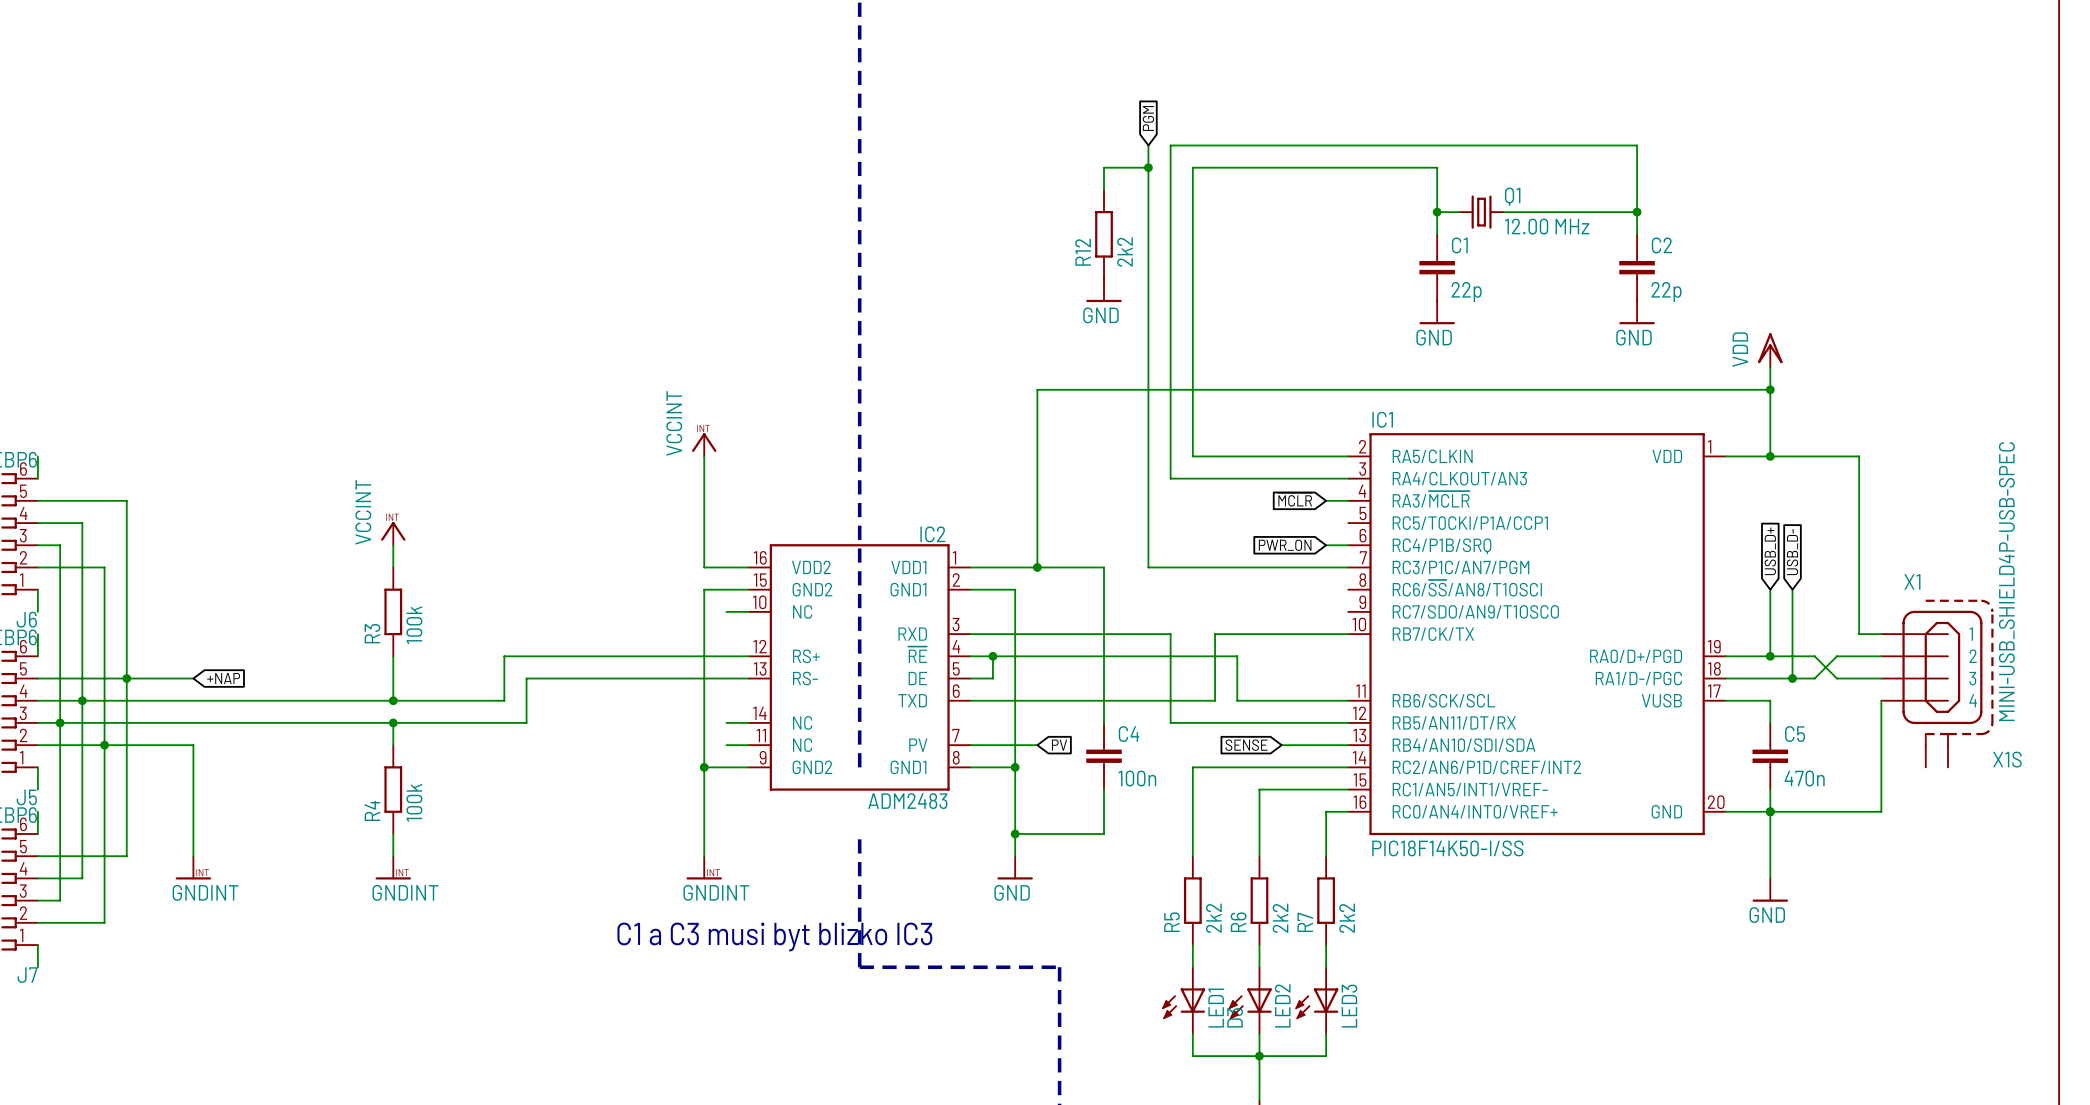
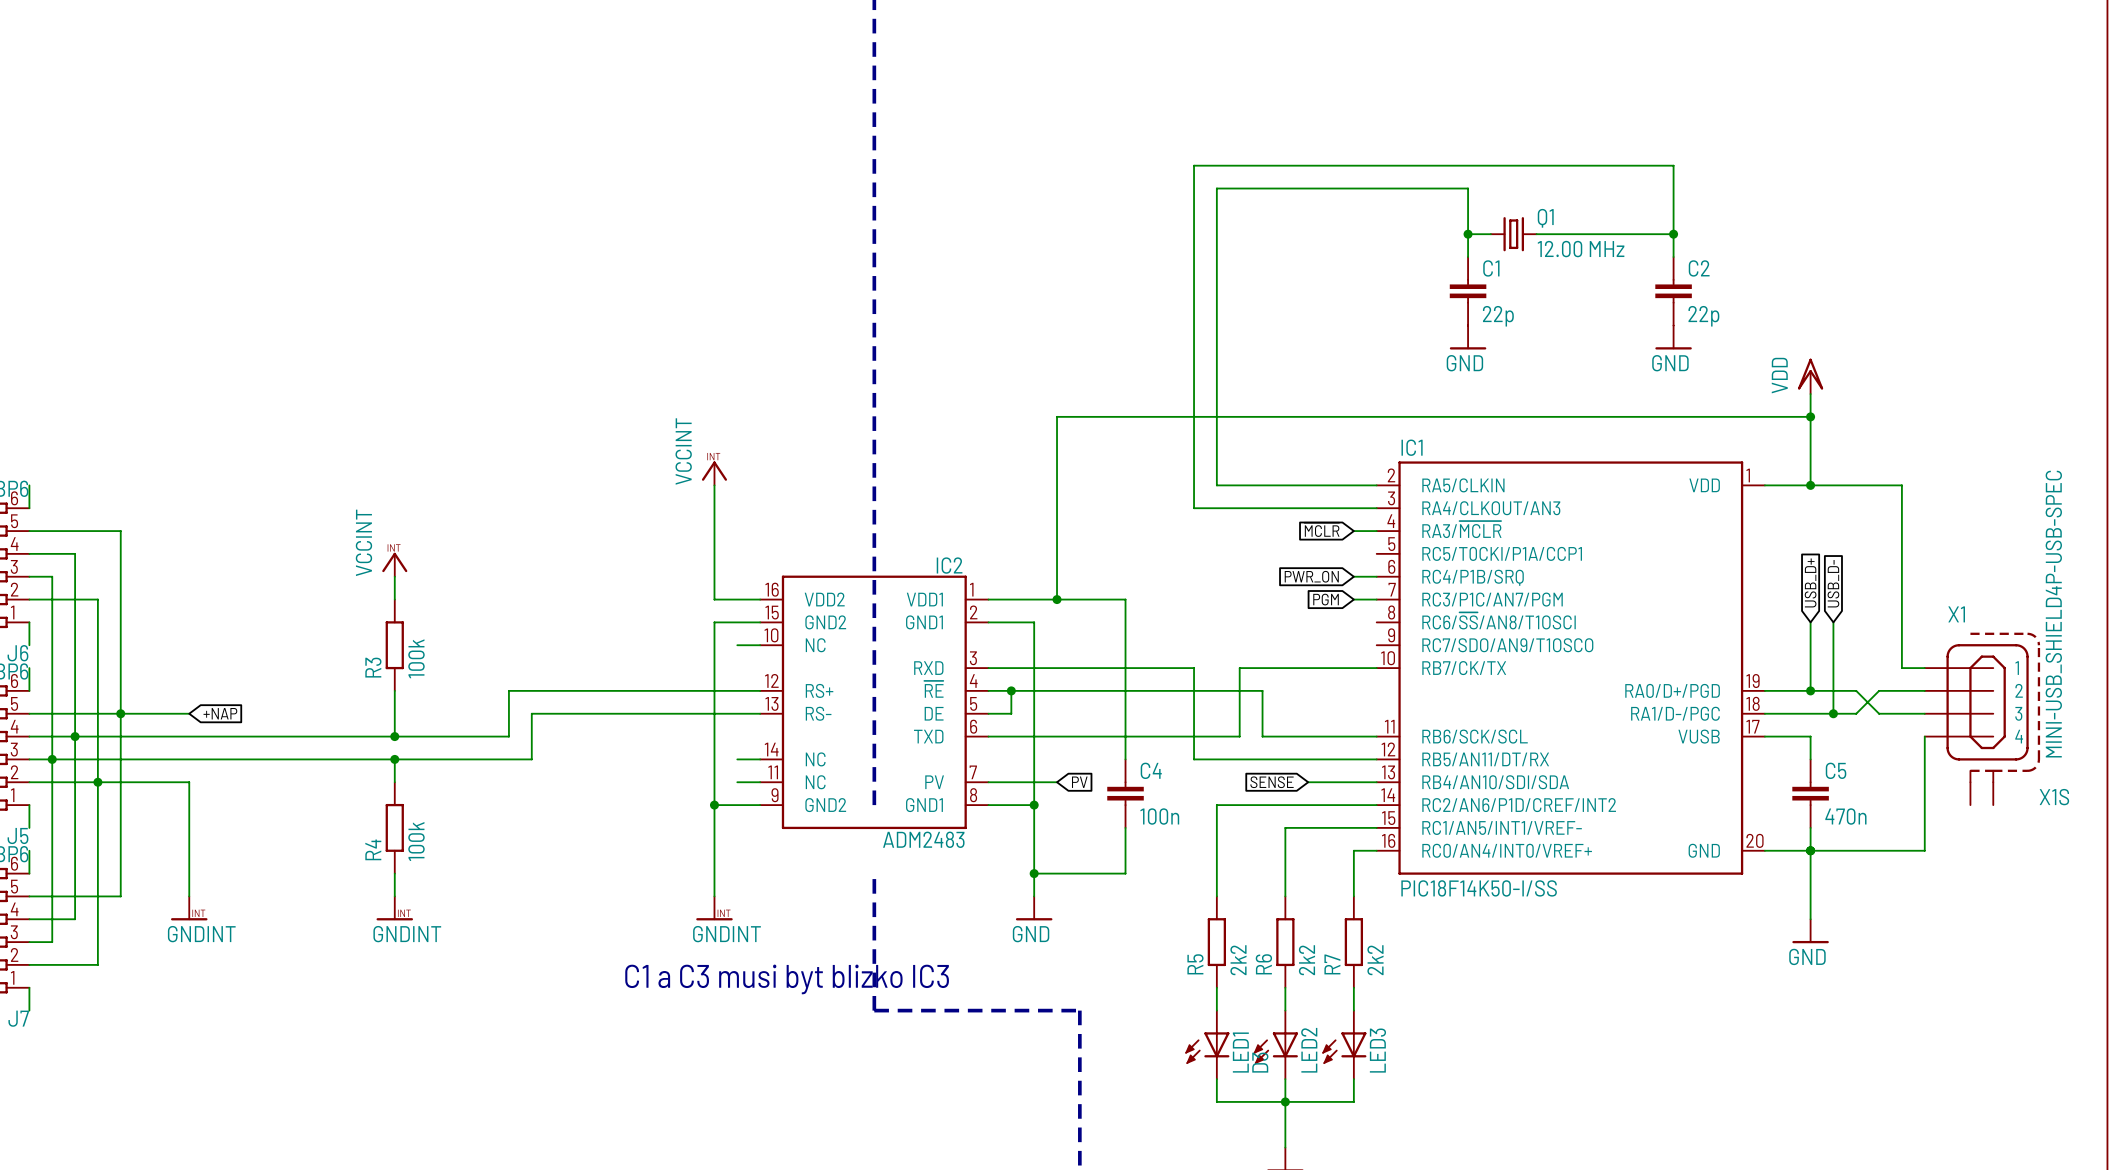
global label: PGM (1148, 118) -> none
wire: (1148, 145) (1148, 567) (1326, 567) -> none
wire: (1148, 167) (1104, 167) (1104, 189) -> none
junction: (1148, 167) -> none
R12: 2k2 (1104, 234) -> none
power symbol: GND (1104, 290) -> none
global label: none -> PGM (1326, 599)

